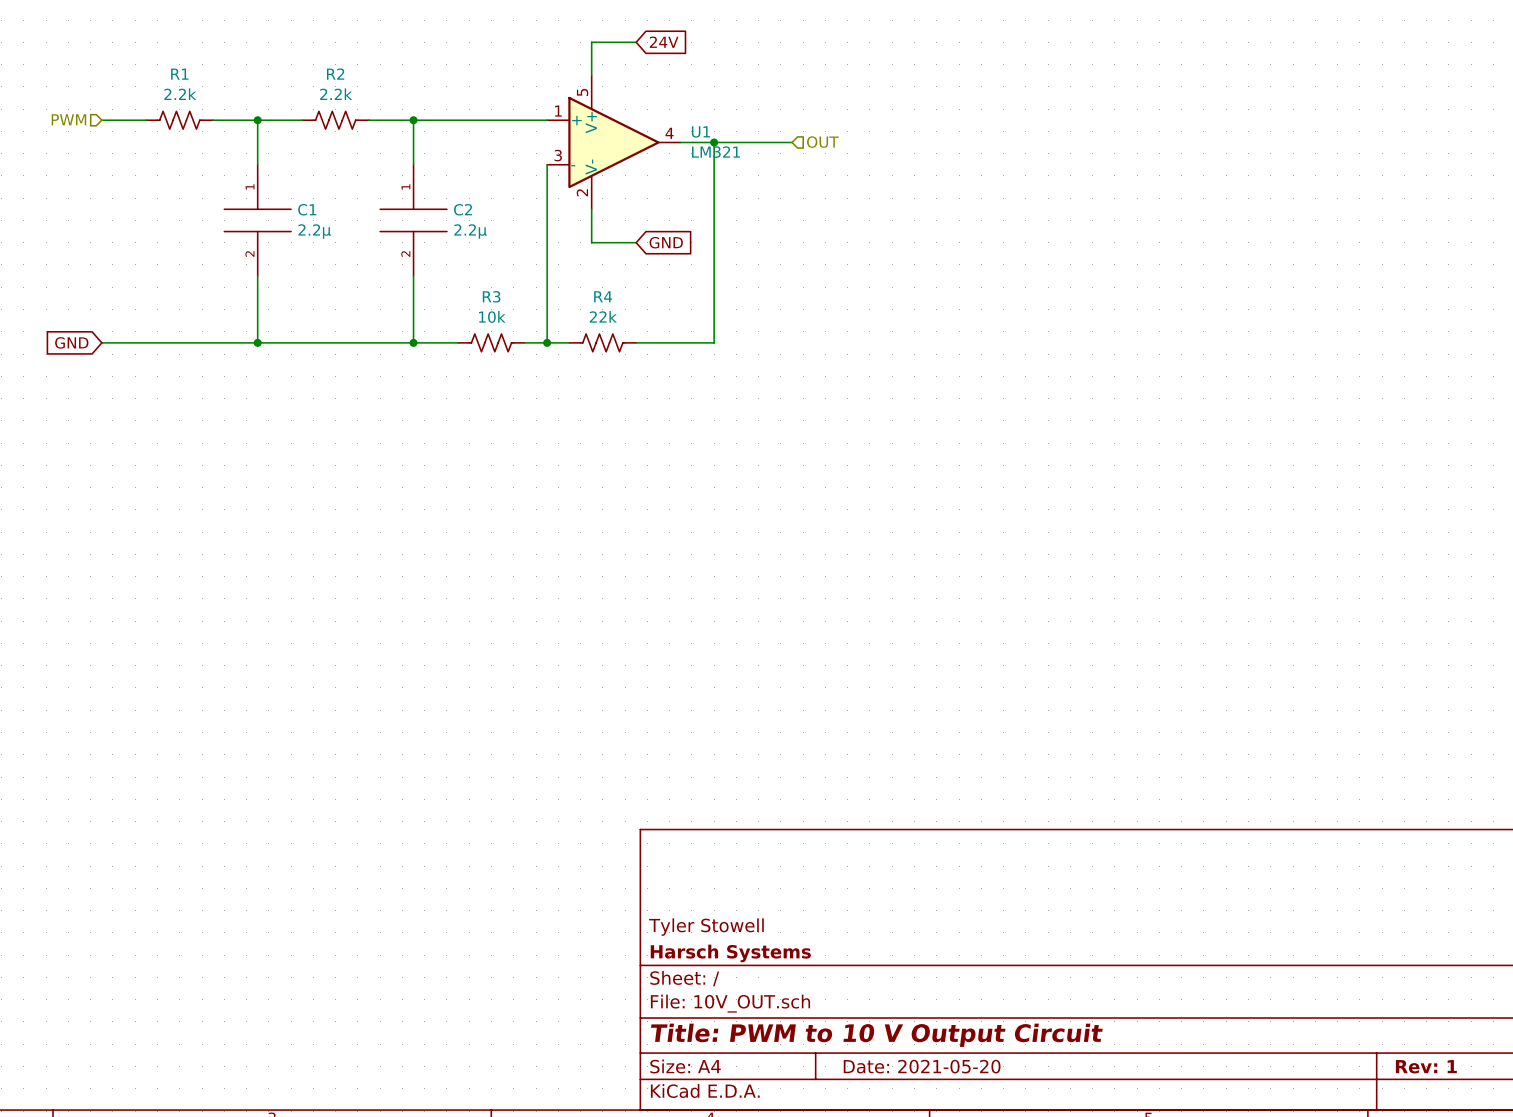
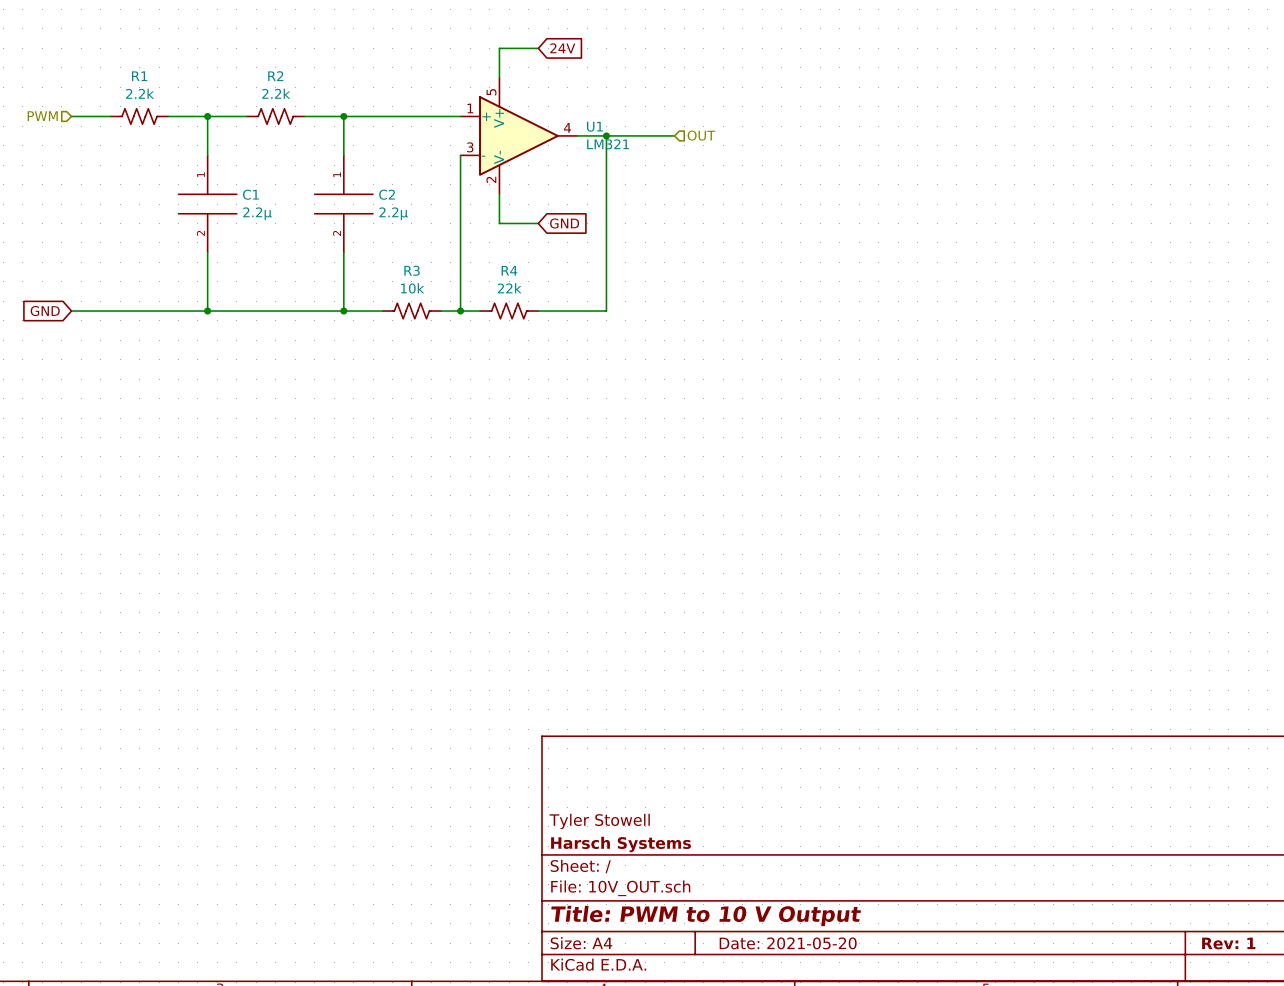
title block: Title: PWM to 10 V Output Circuit (876, 1035) -> Title: PWM to 10 V Output (706, 915)

